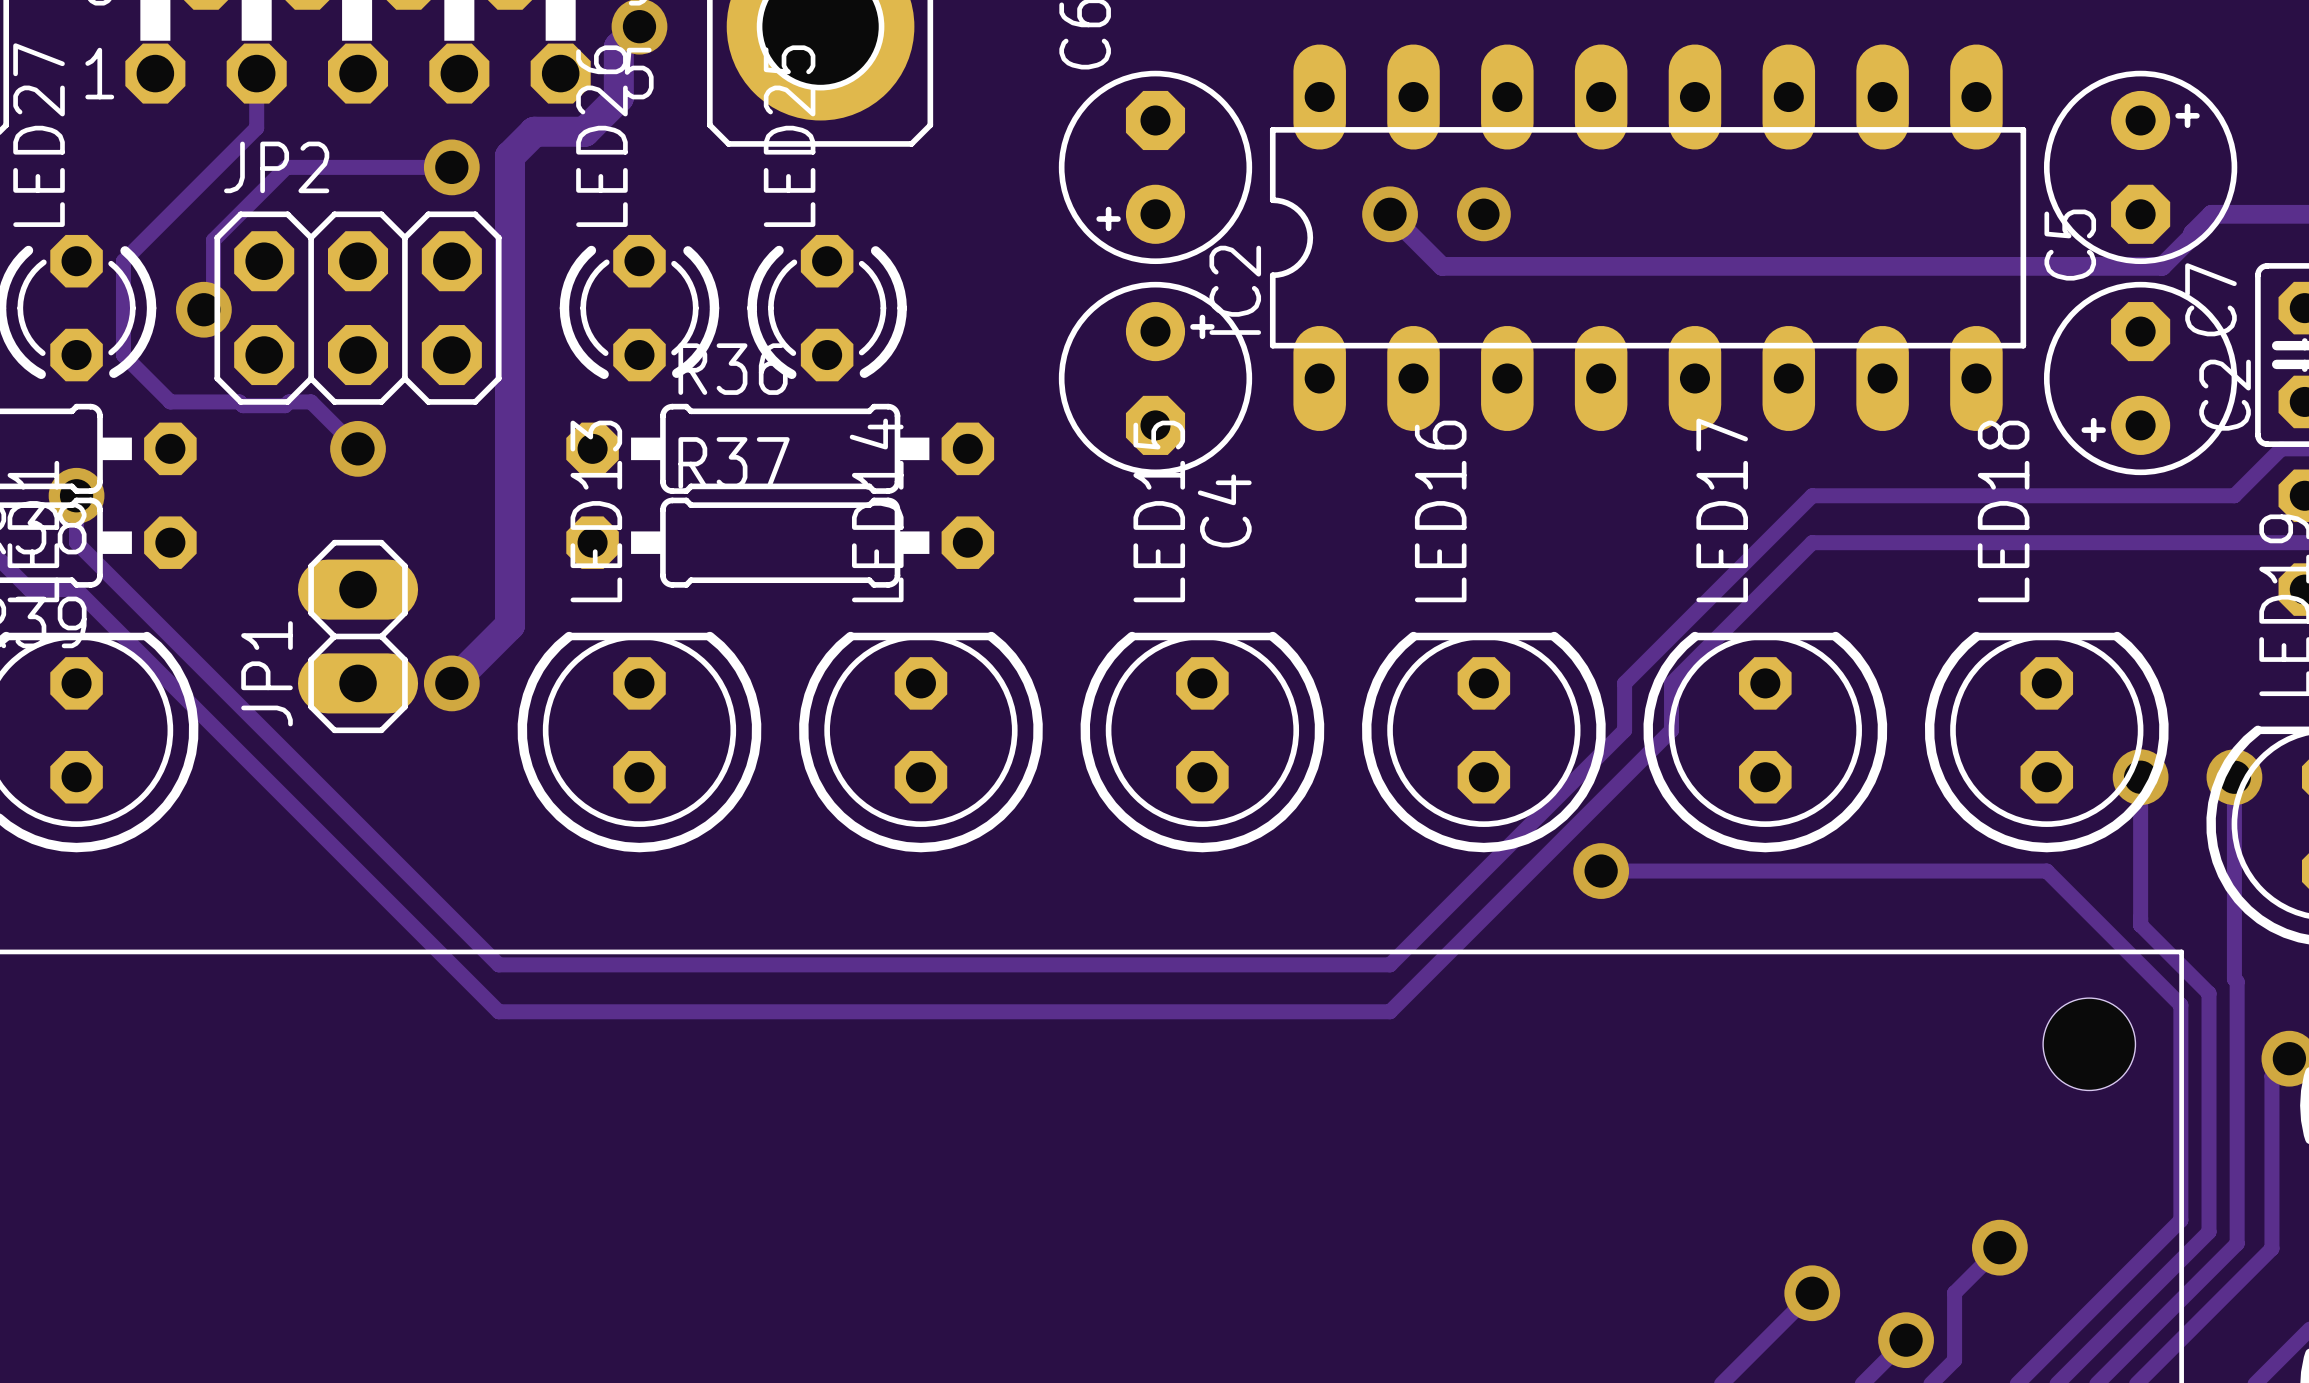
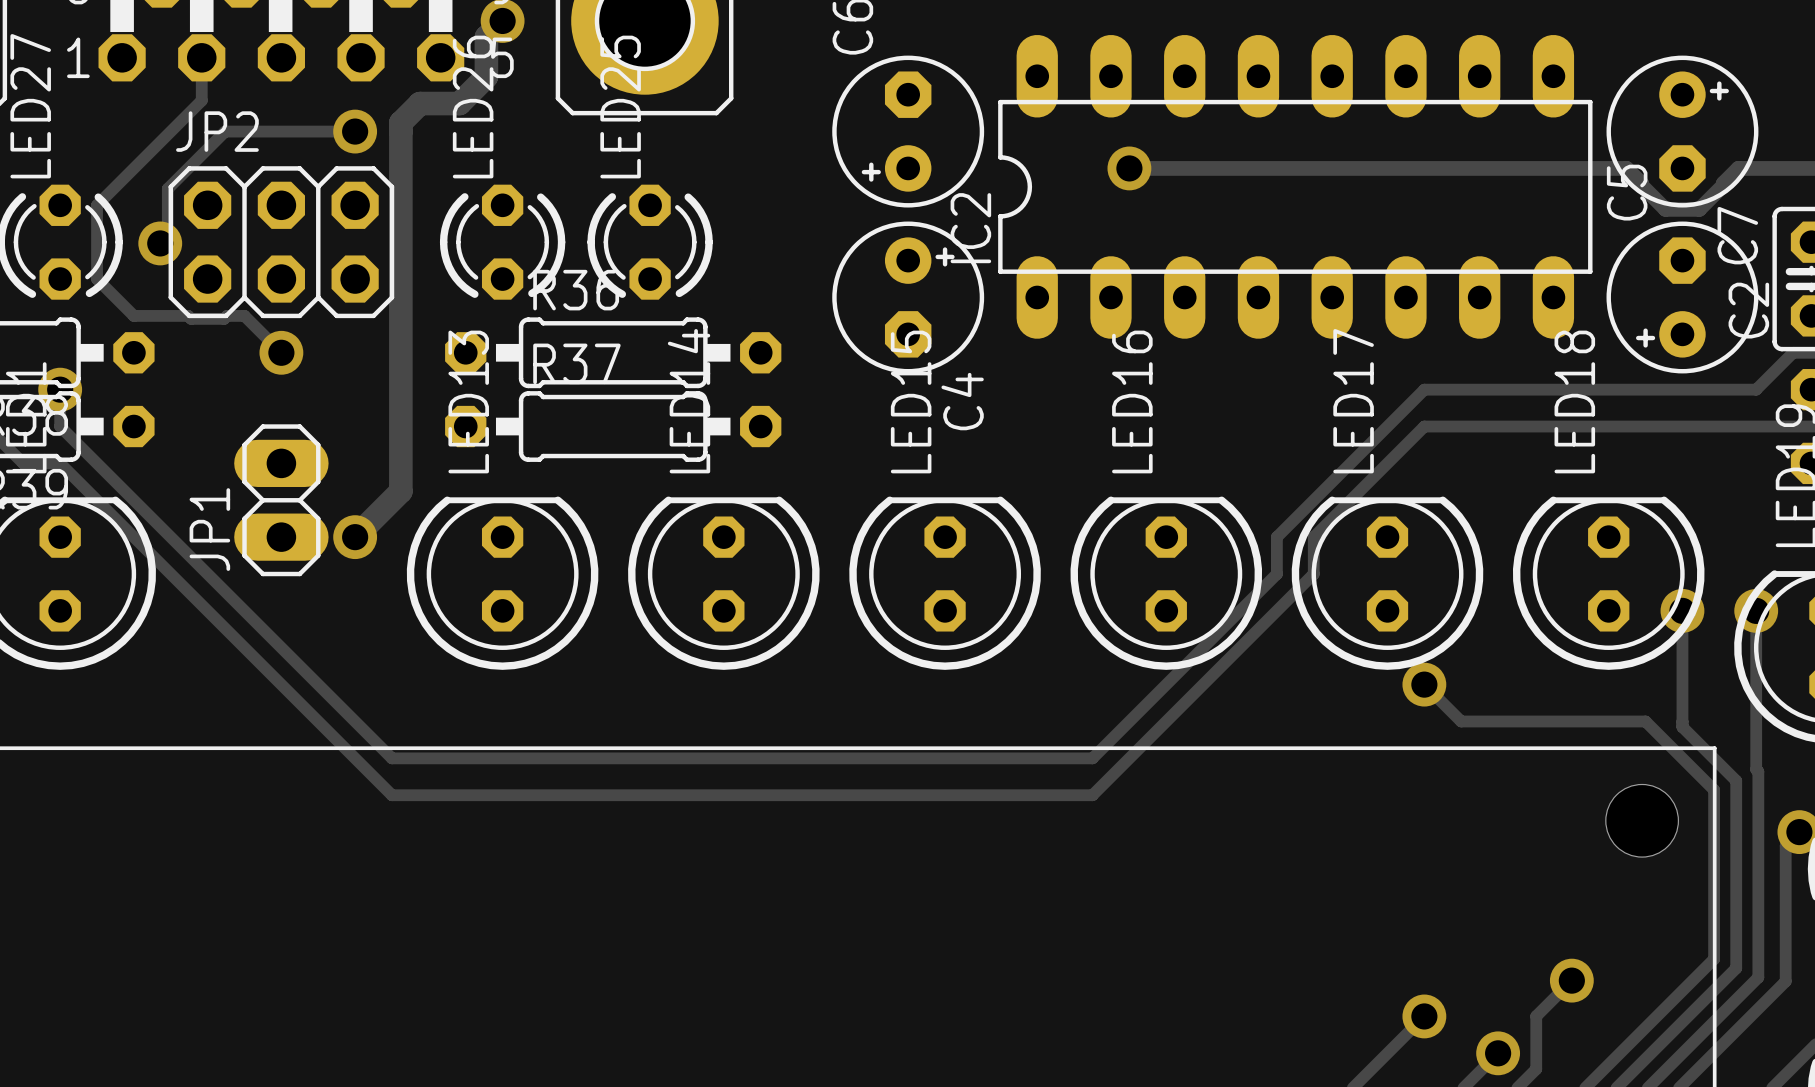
track: (1390, 214) (1442, 266) (2119, 266) -> (1129, 168) (1626, 168) (1665, 209)
via position: (1390, 214) -> (1129, 168)
via: (1483, 214) -> none
track: (1601, 871) (2046, 871) (2093, 917) -> (1424, 684) (1461, 721) (1645, 721)
via position: (1601, 871) -> (1424, 684)

